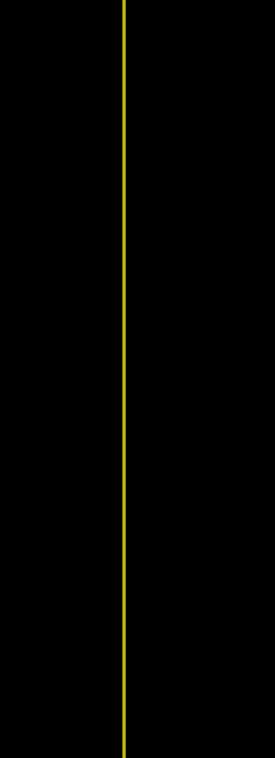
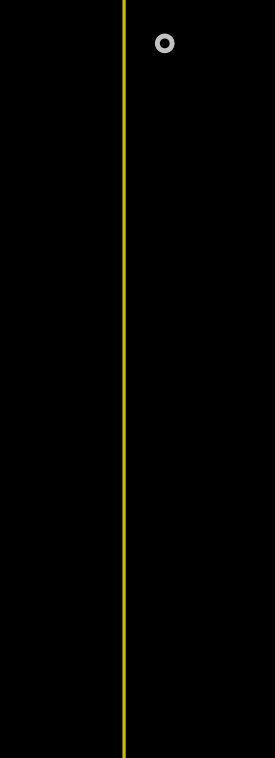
via: none -> (164, 43)

